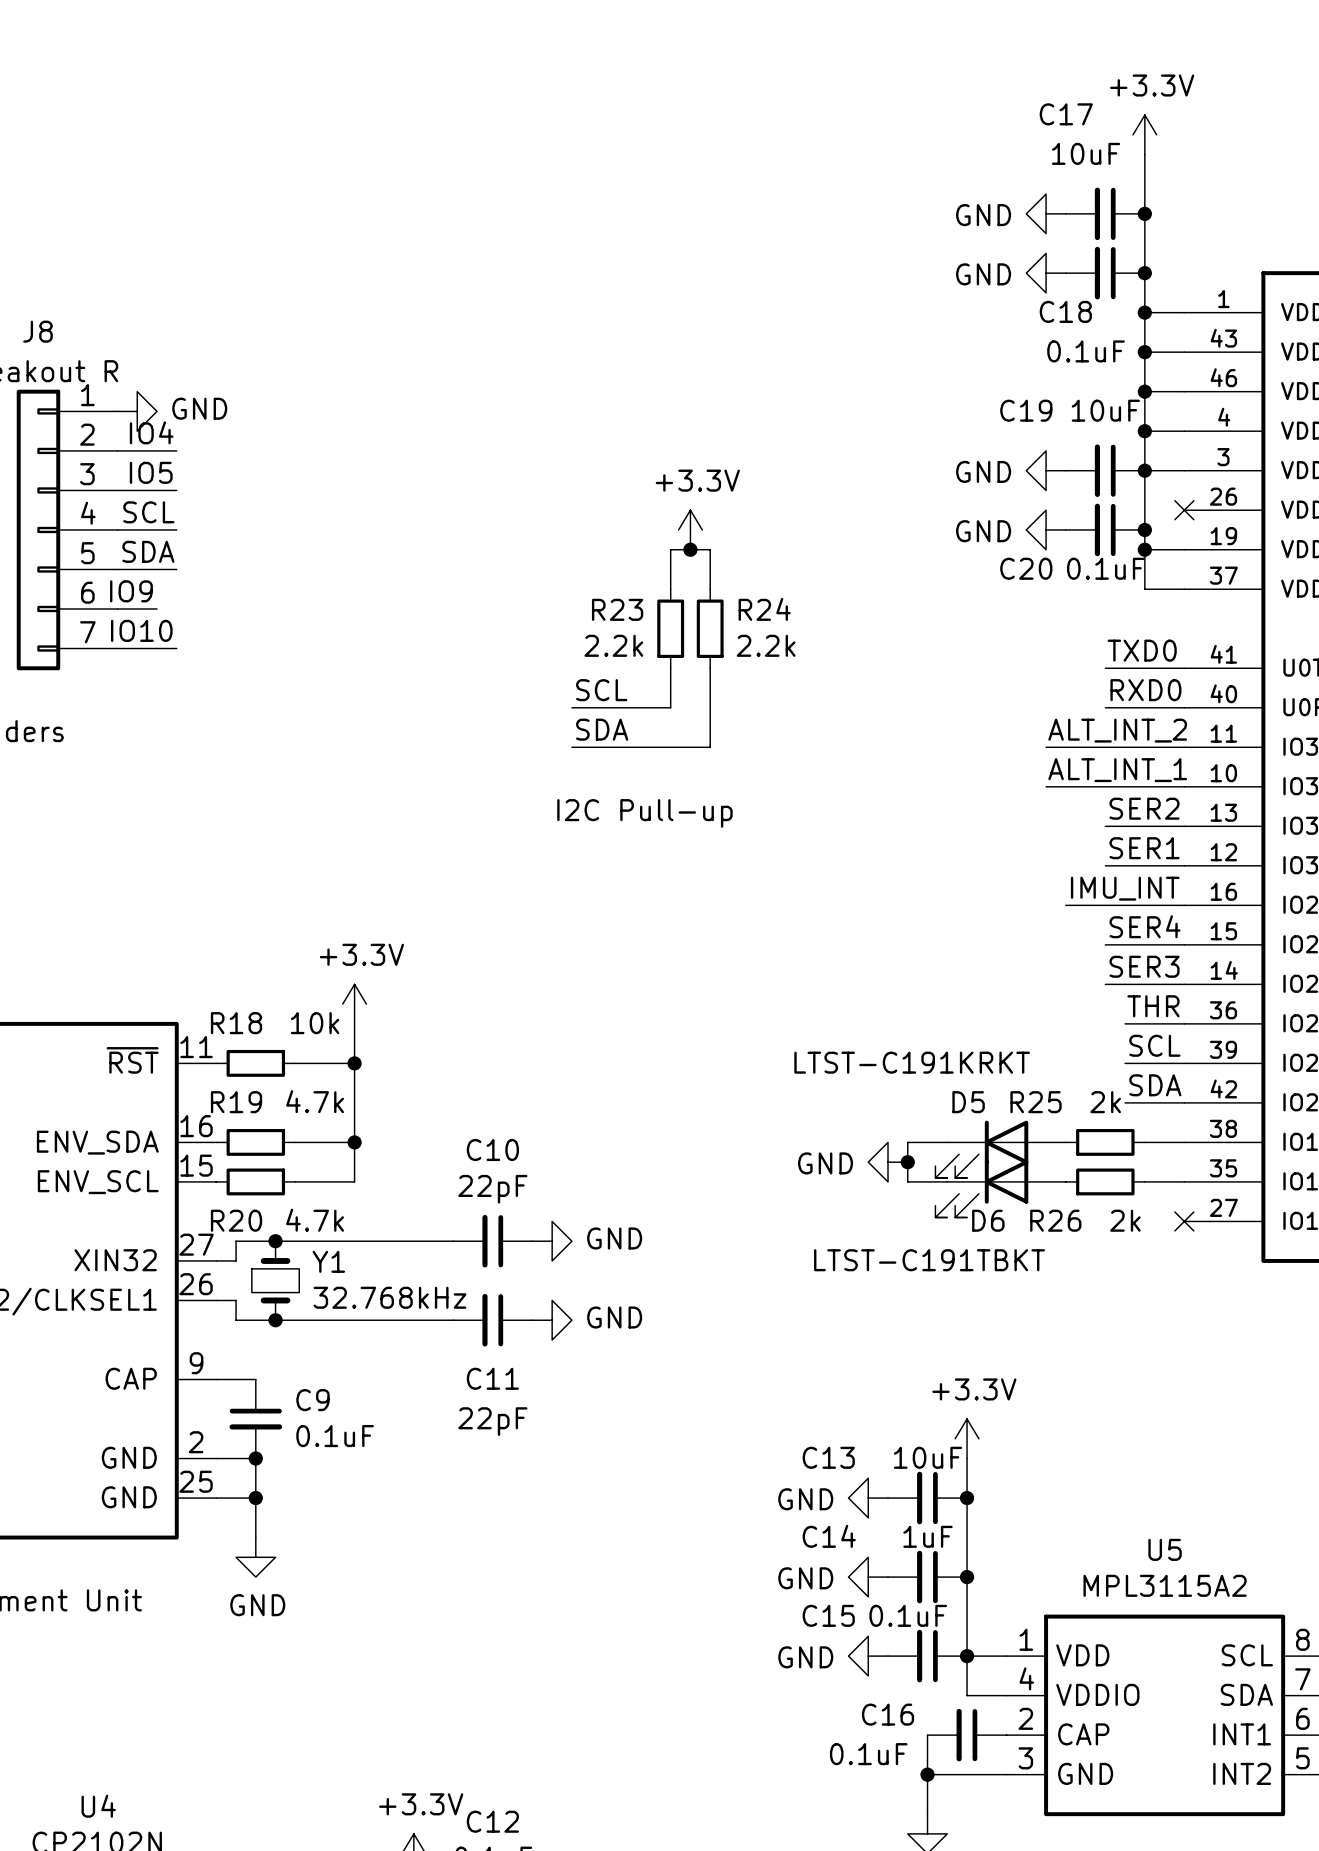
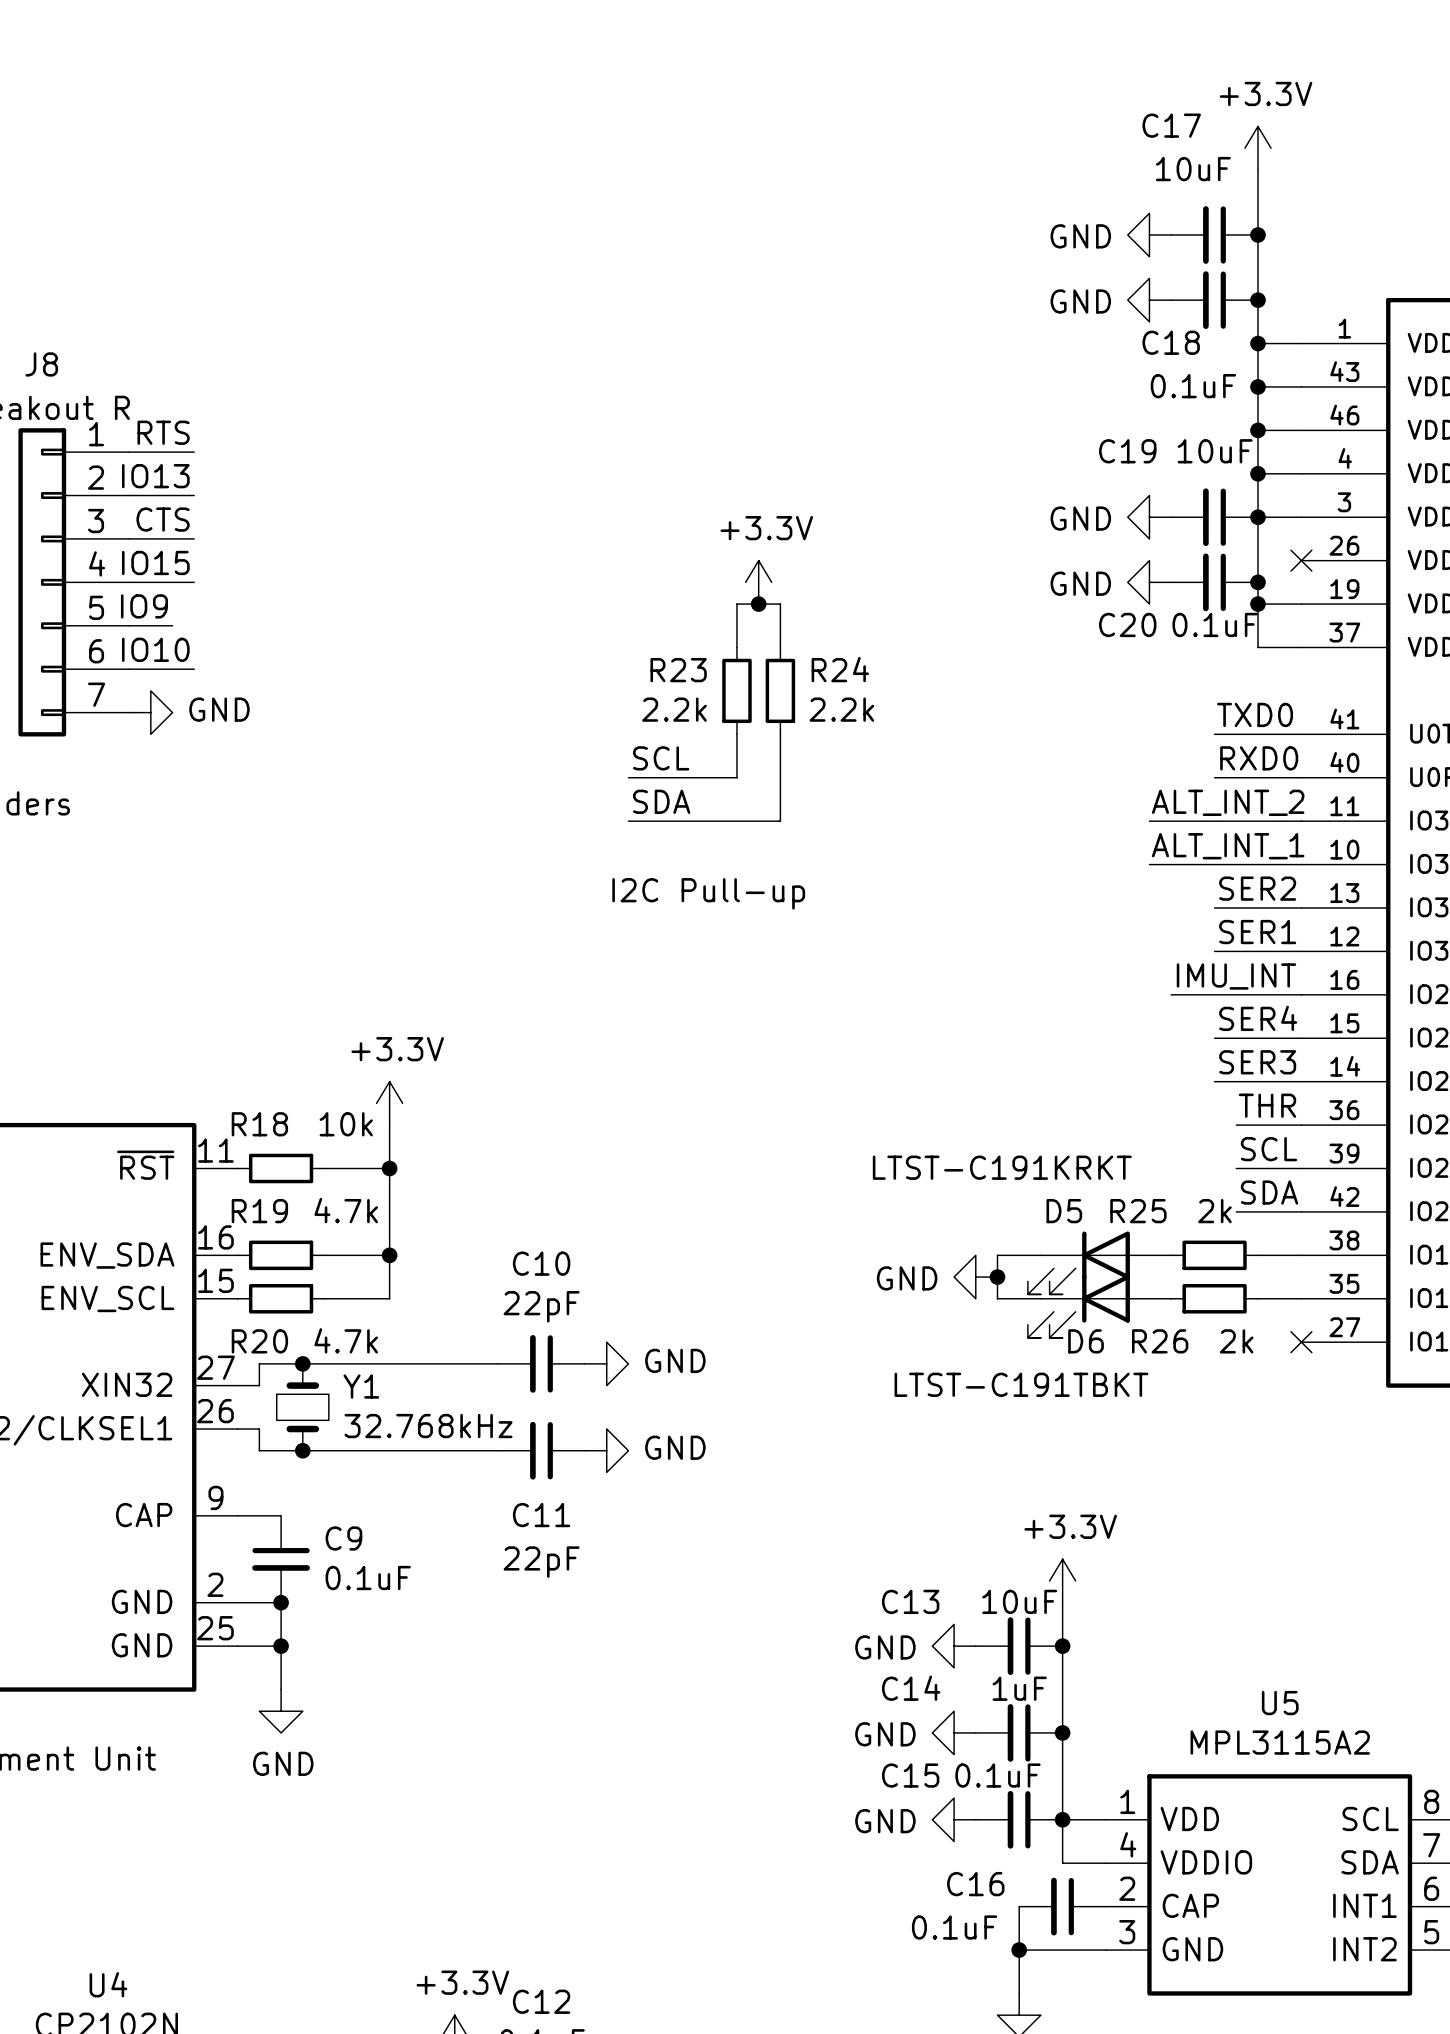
label: none -> RTS (163, 432)
power symbol position: GND (137, 411) -> GND (150, 712)
label: IO4 (151, 432) -> IO13 (155, 476)
label: IO5 (151, 472) -> CTS (163, 519)
label: SCL (148, 512) -> IO15 (155, 562)
label: SDA (148, 551) -> none
wire: (157, 569) (176, 569) -> (172, 669) (194, 669)
label position: IO9 (131, 591) -> IO9 (144, 606)
label position: IO10 (141, 630) -> IO10 (155, 649)
wire: (117, 648) (176, 648) -> (129, 452) (194, 452)

